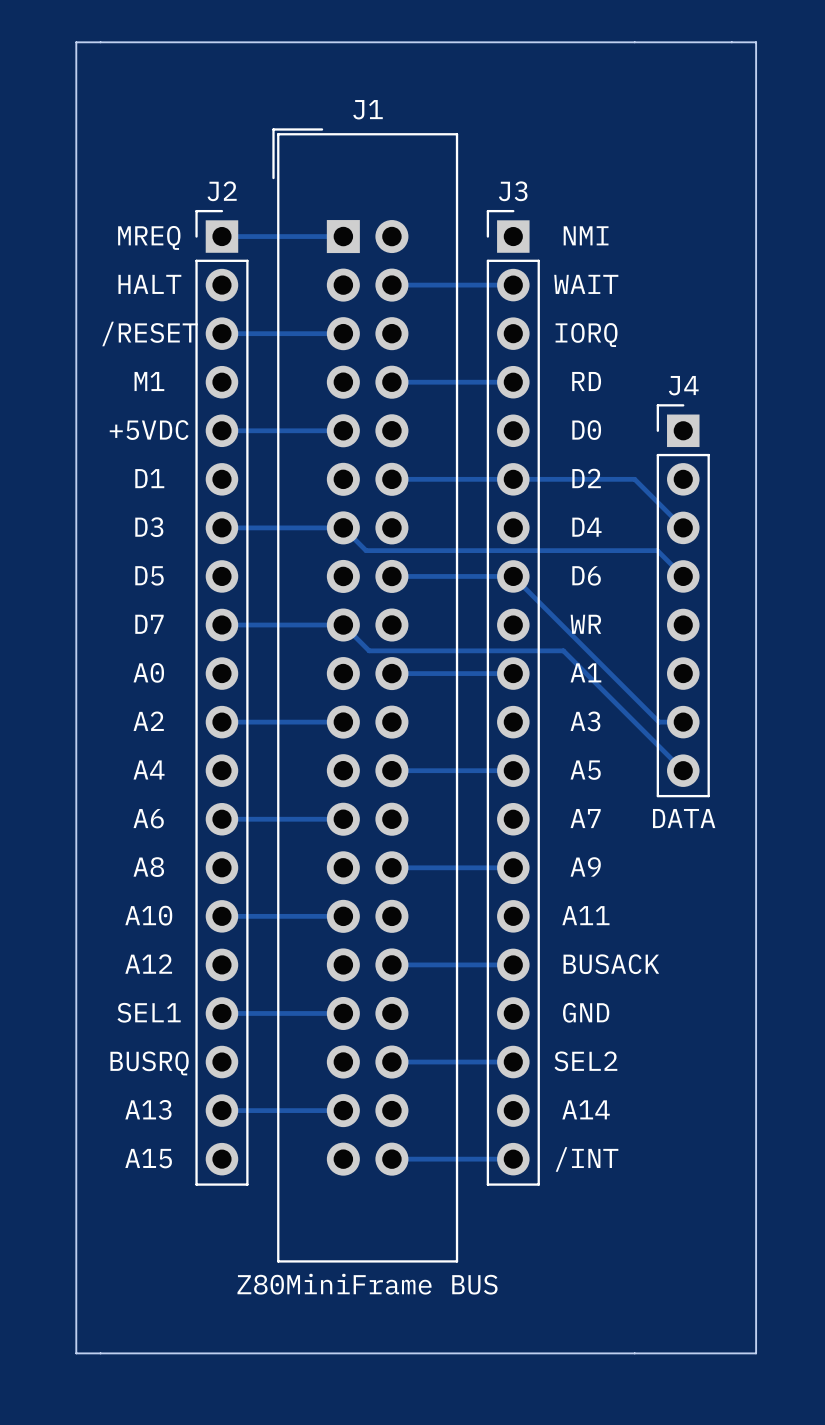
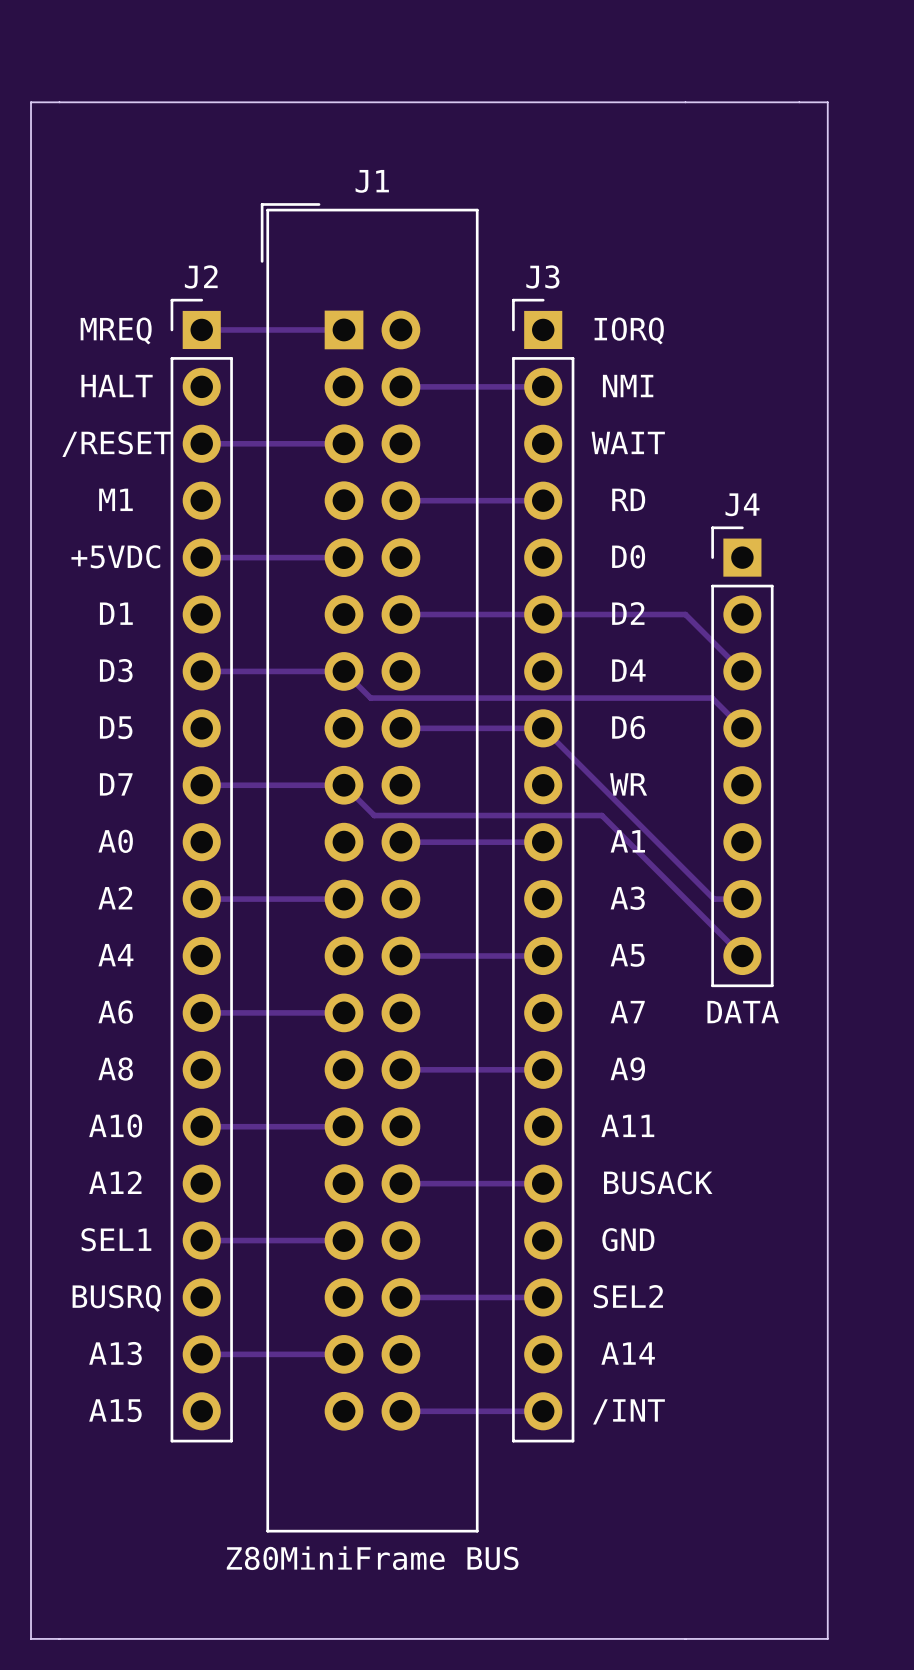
text: NMI (586, 235) -> IORQ (629, 330)
text: WAIT (586, 284) -> NMI (628, 386)
text: IORQ (586, 335) -> WAIT (628, 442)

